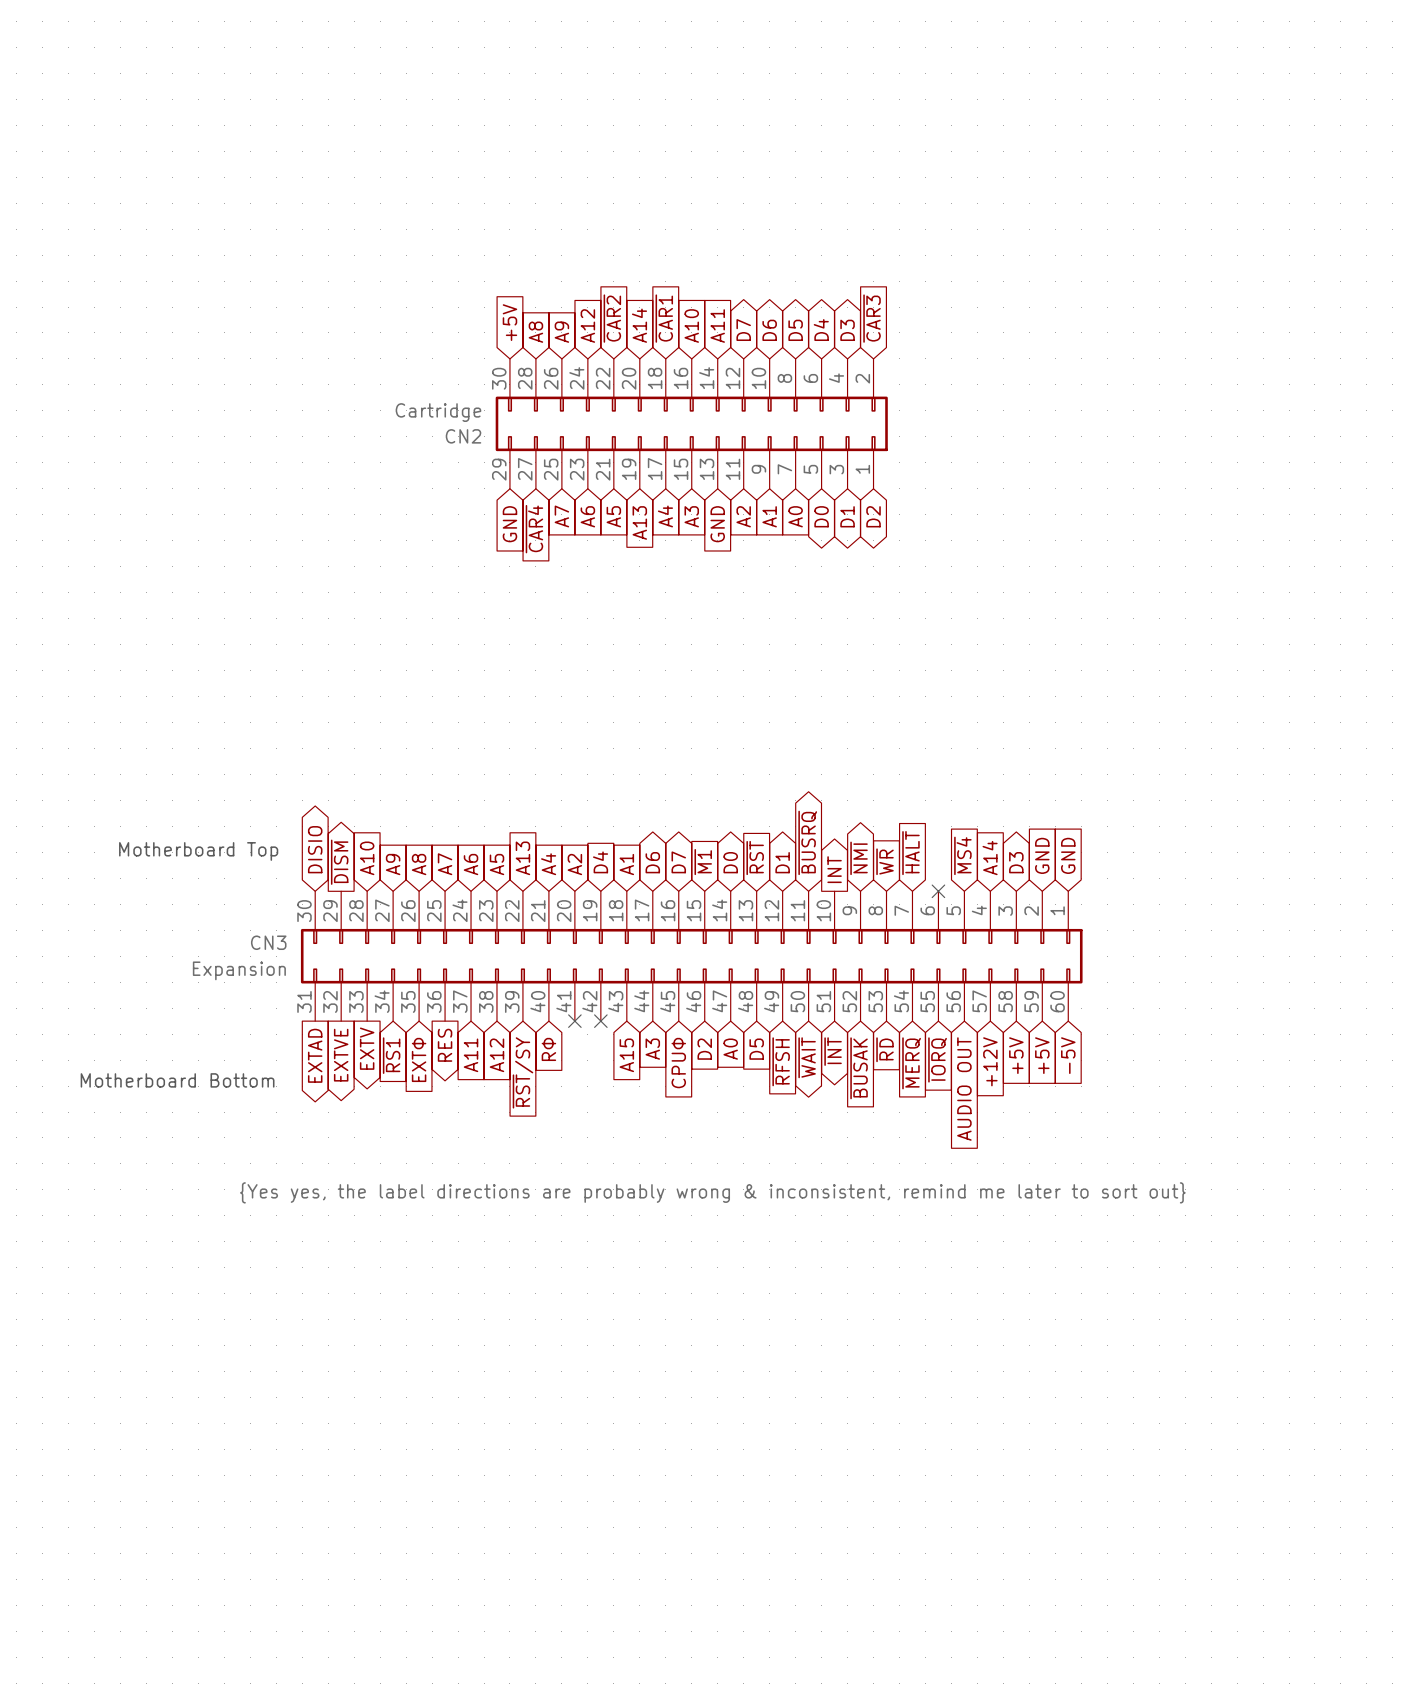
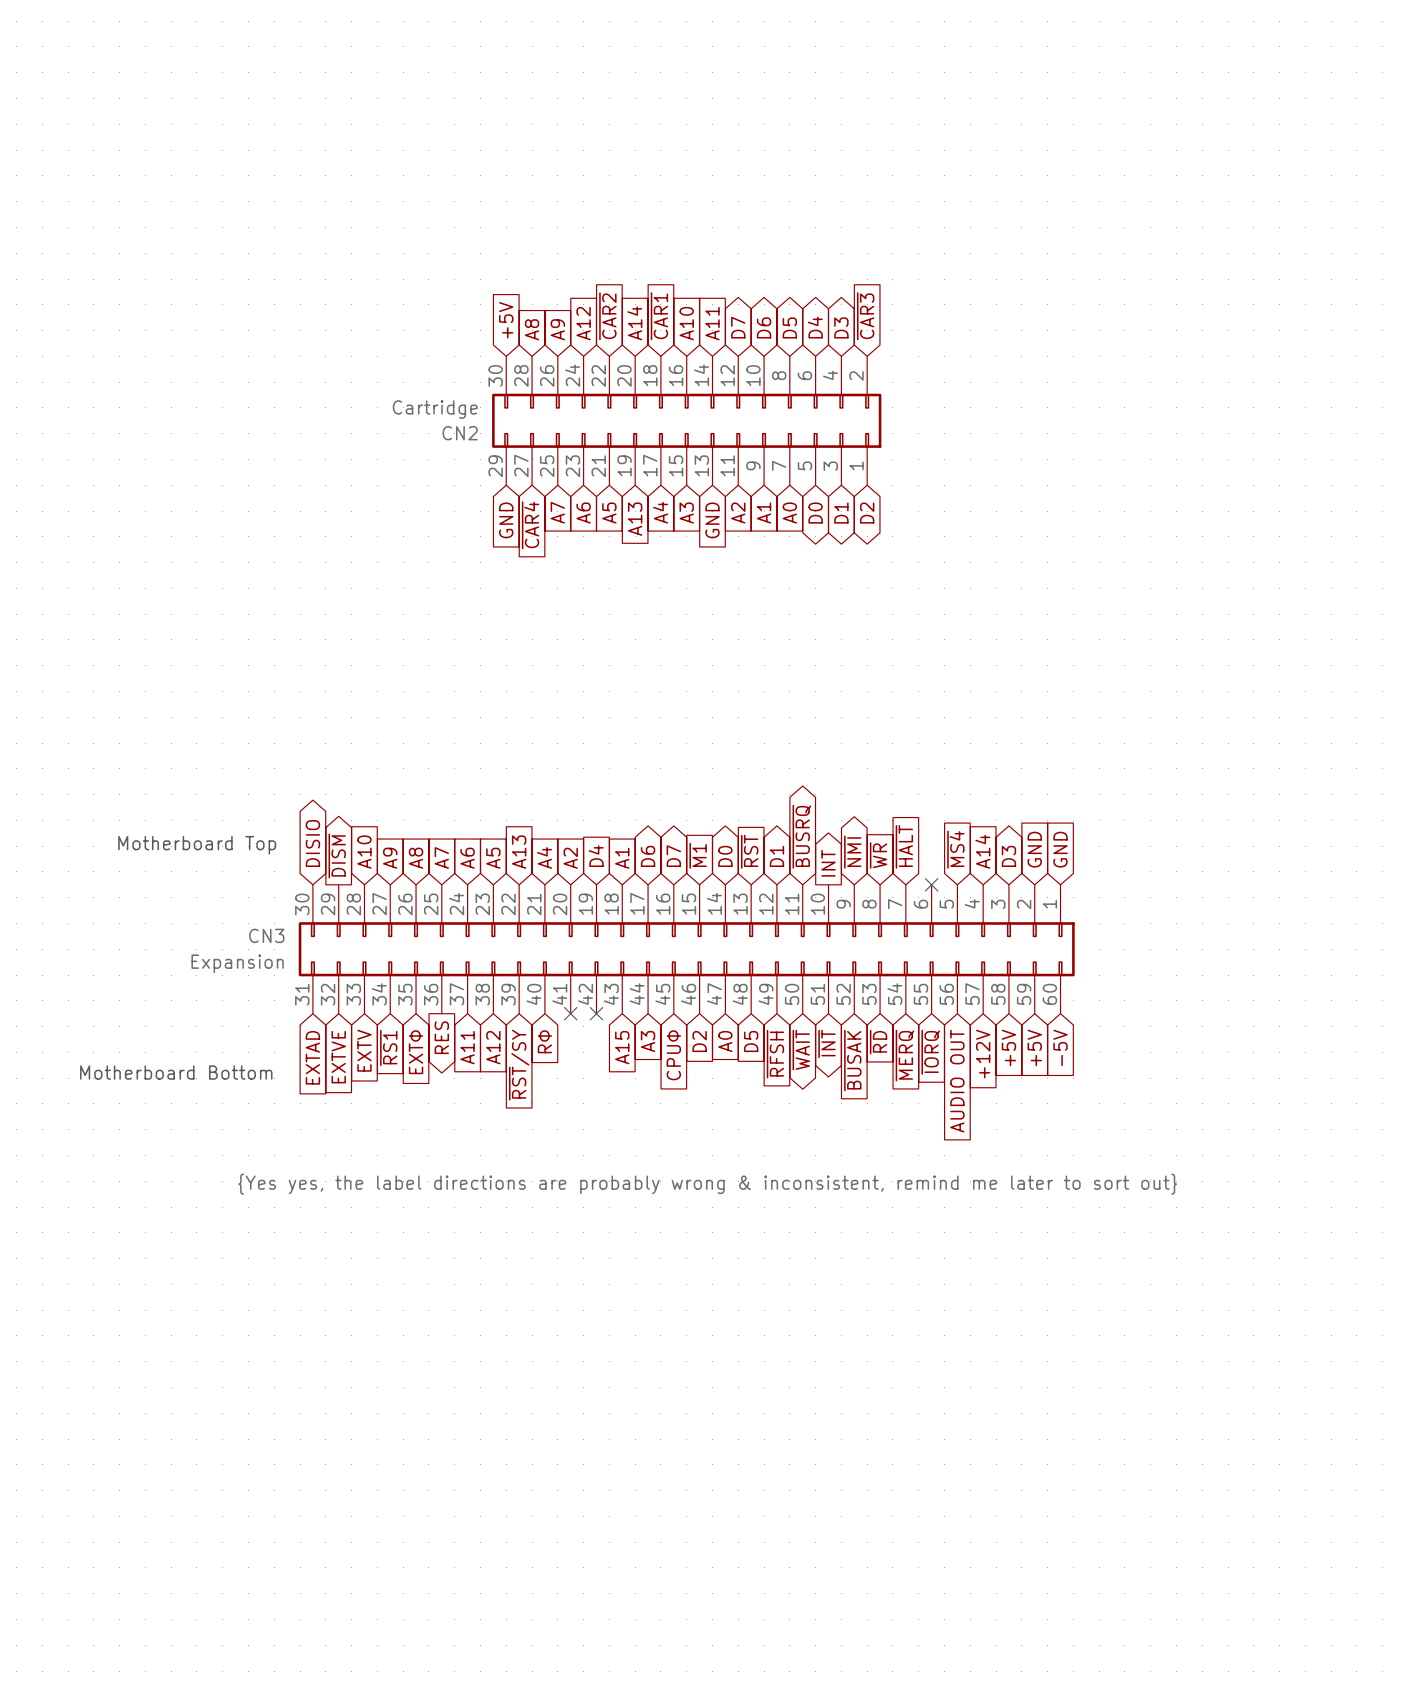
global label shape: output (367, 1048) -> input (364, 1050)
global label shape: output (315, 1055) -> input (312, 1057)
global label shape: output (341, 1055) -> input (338, 1057)

